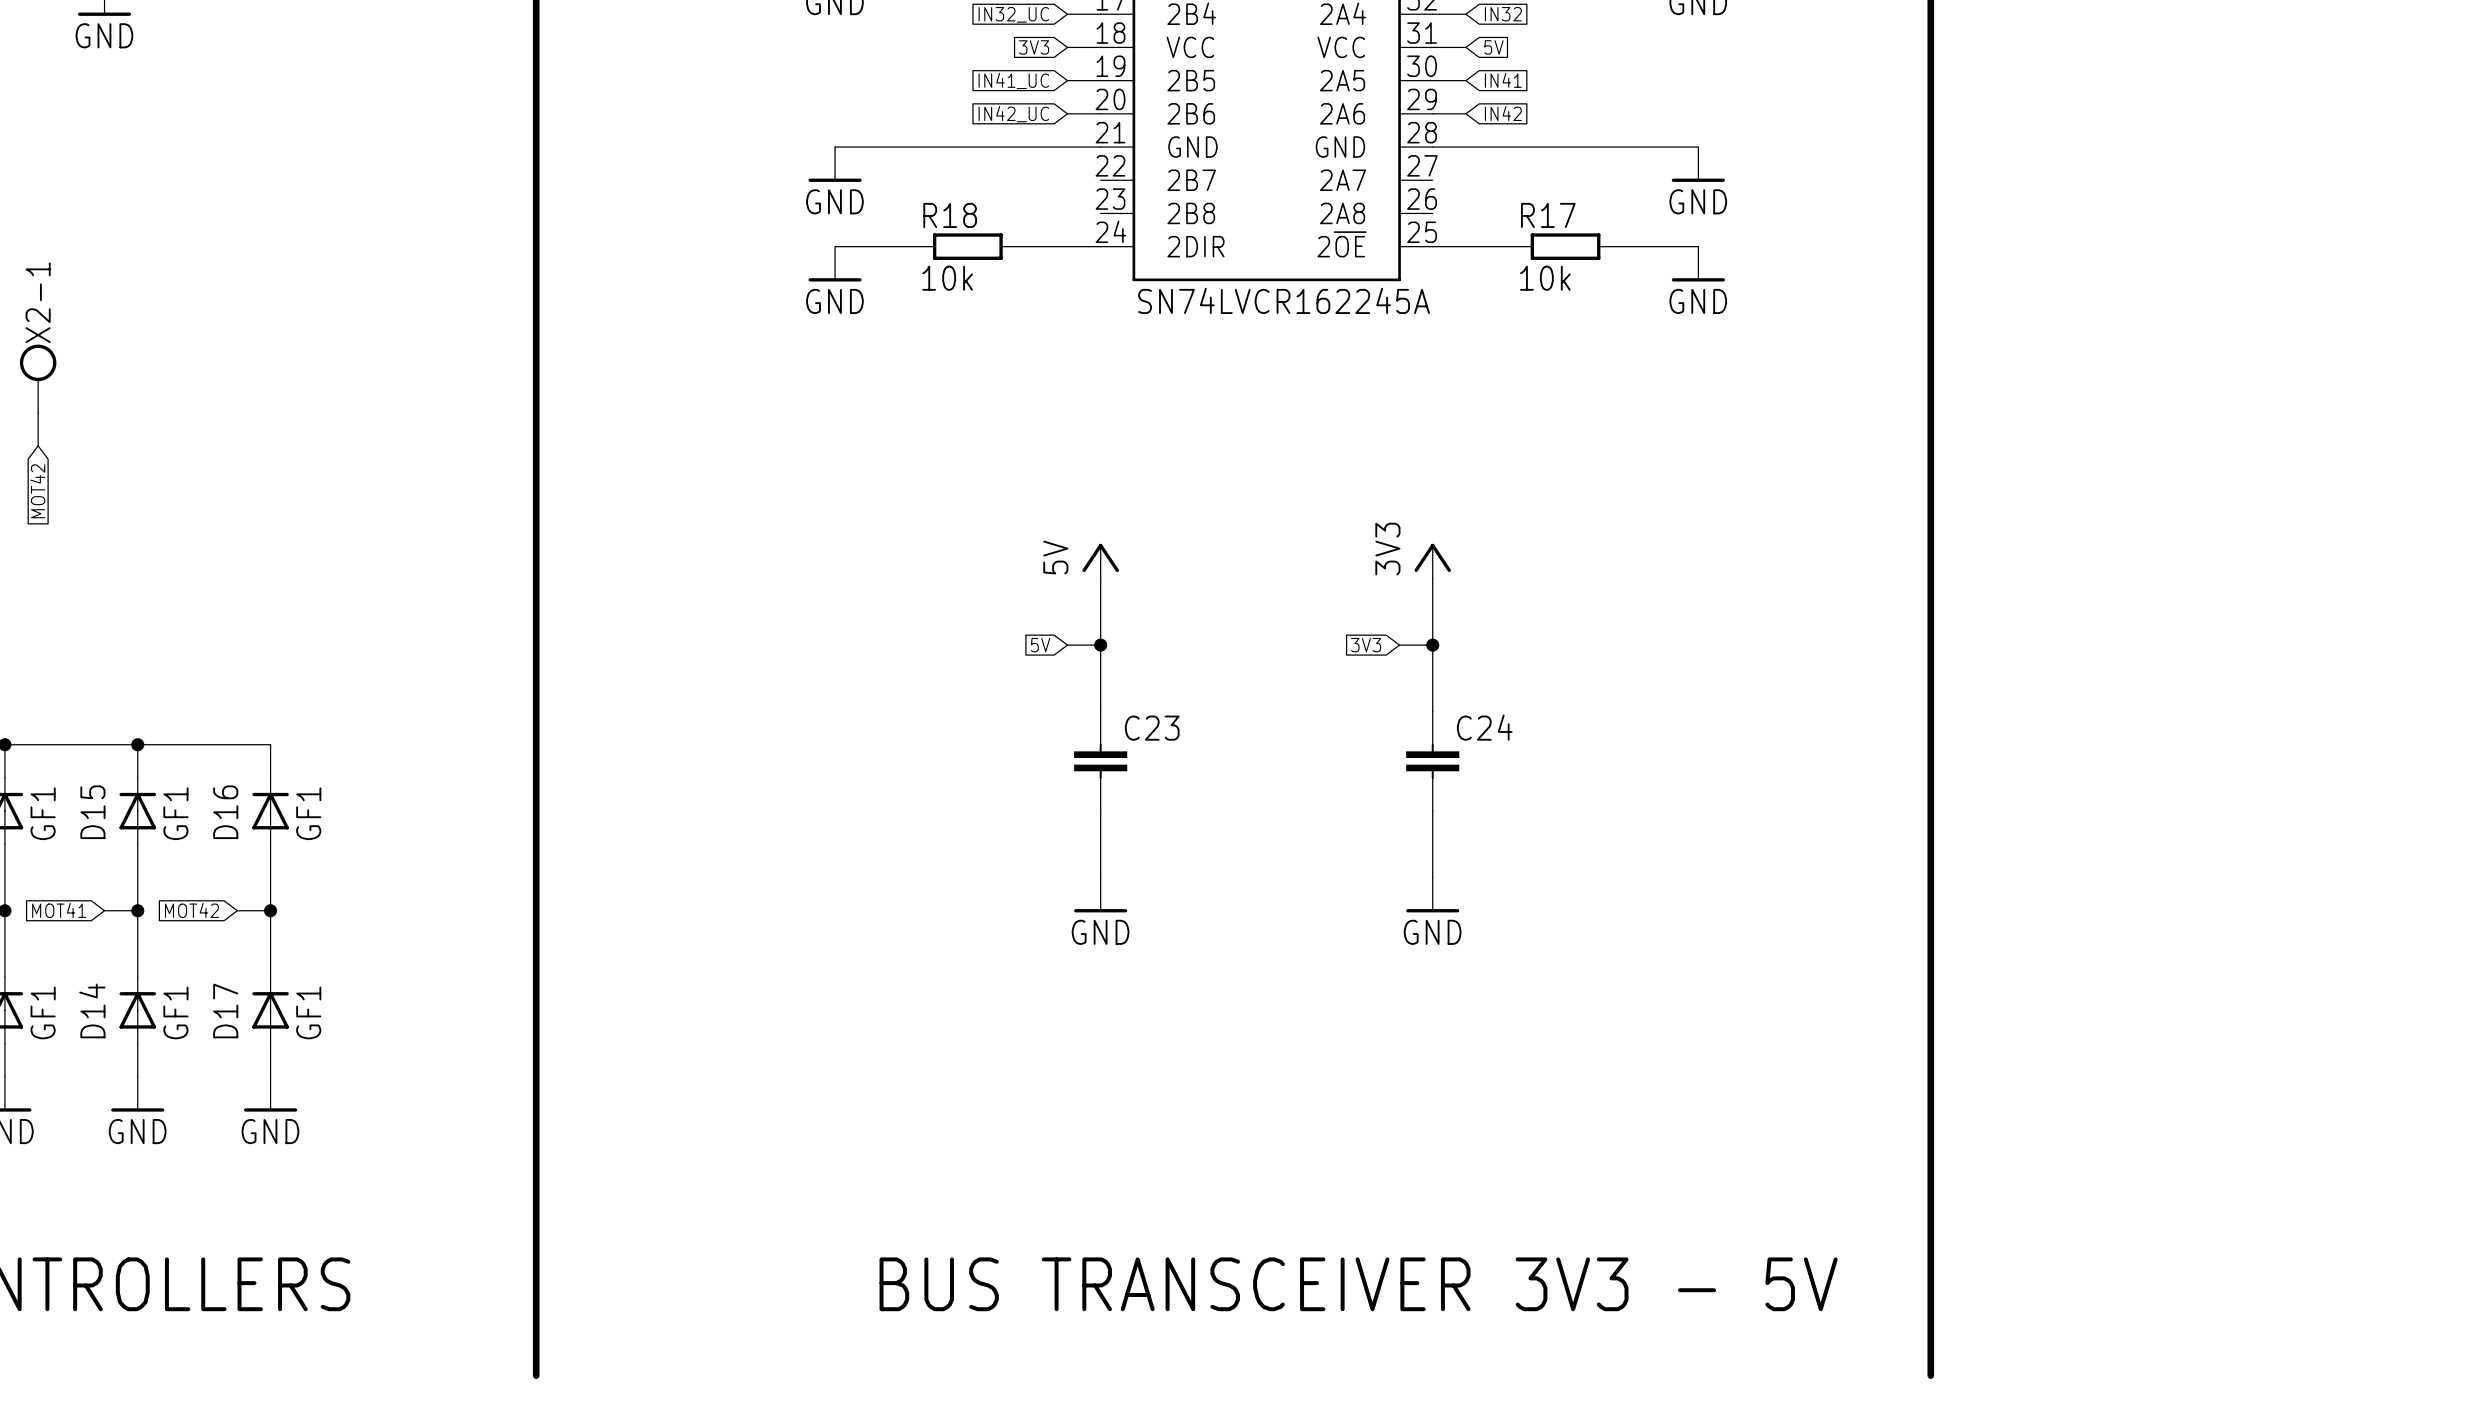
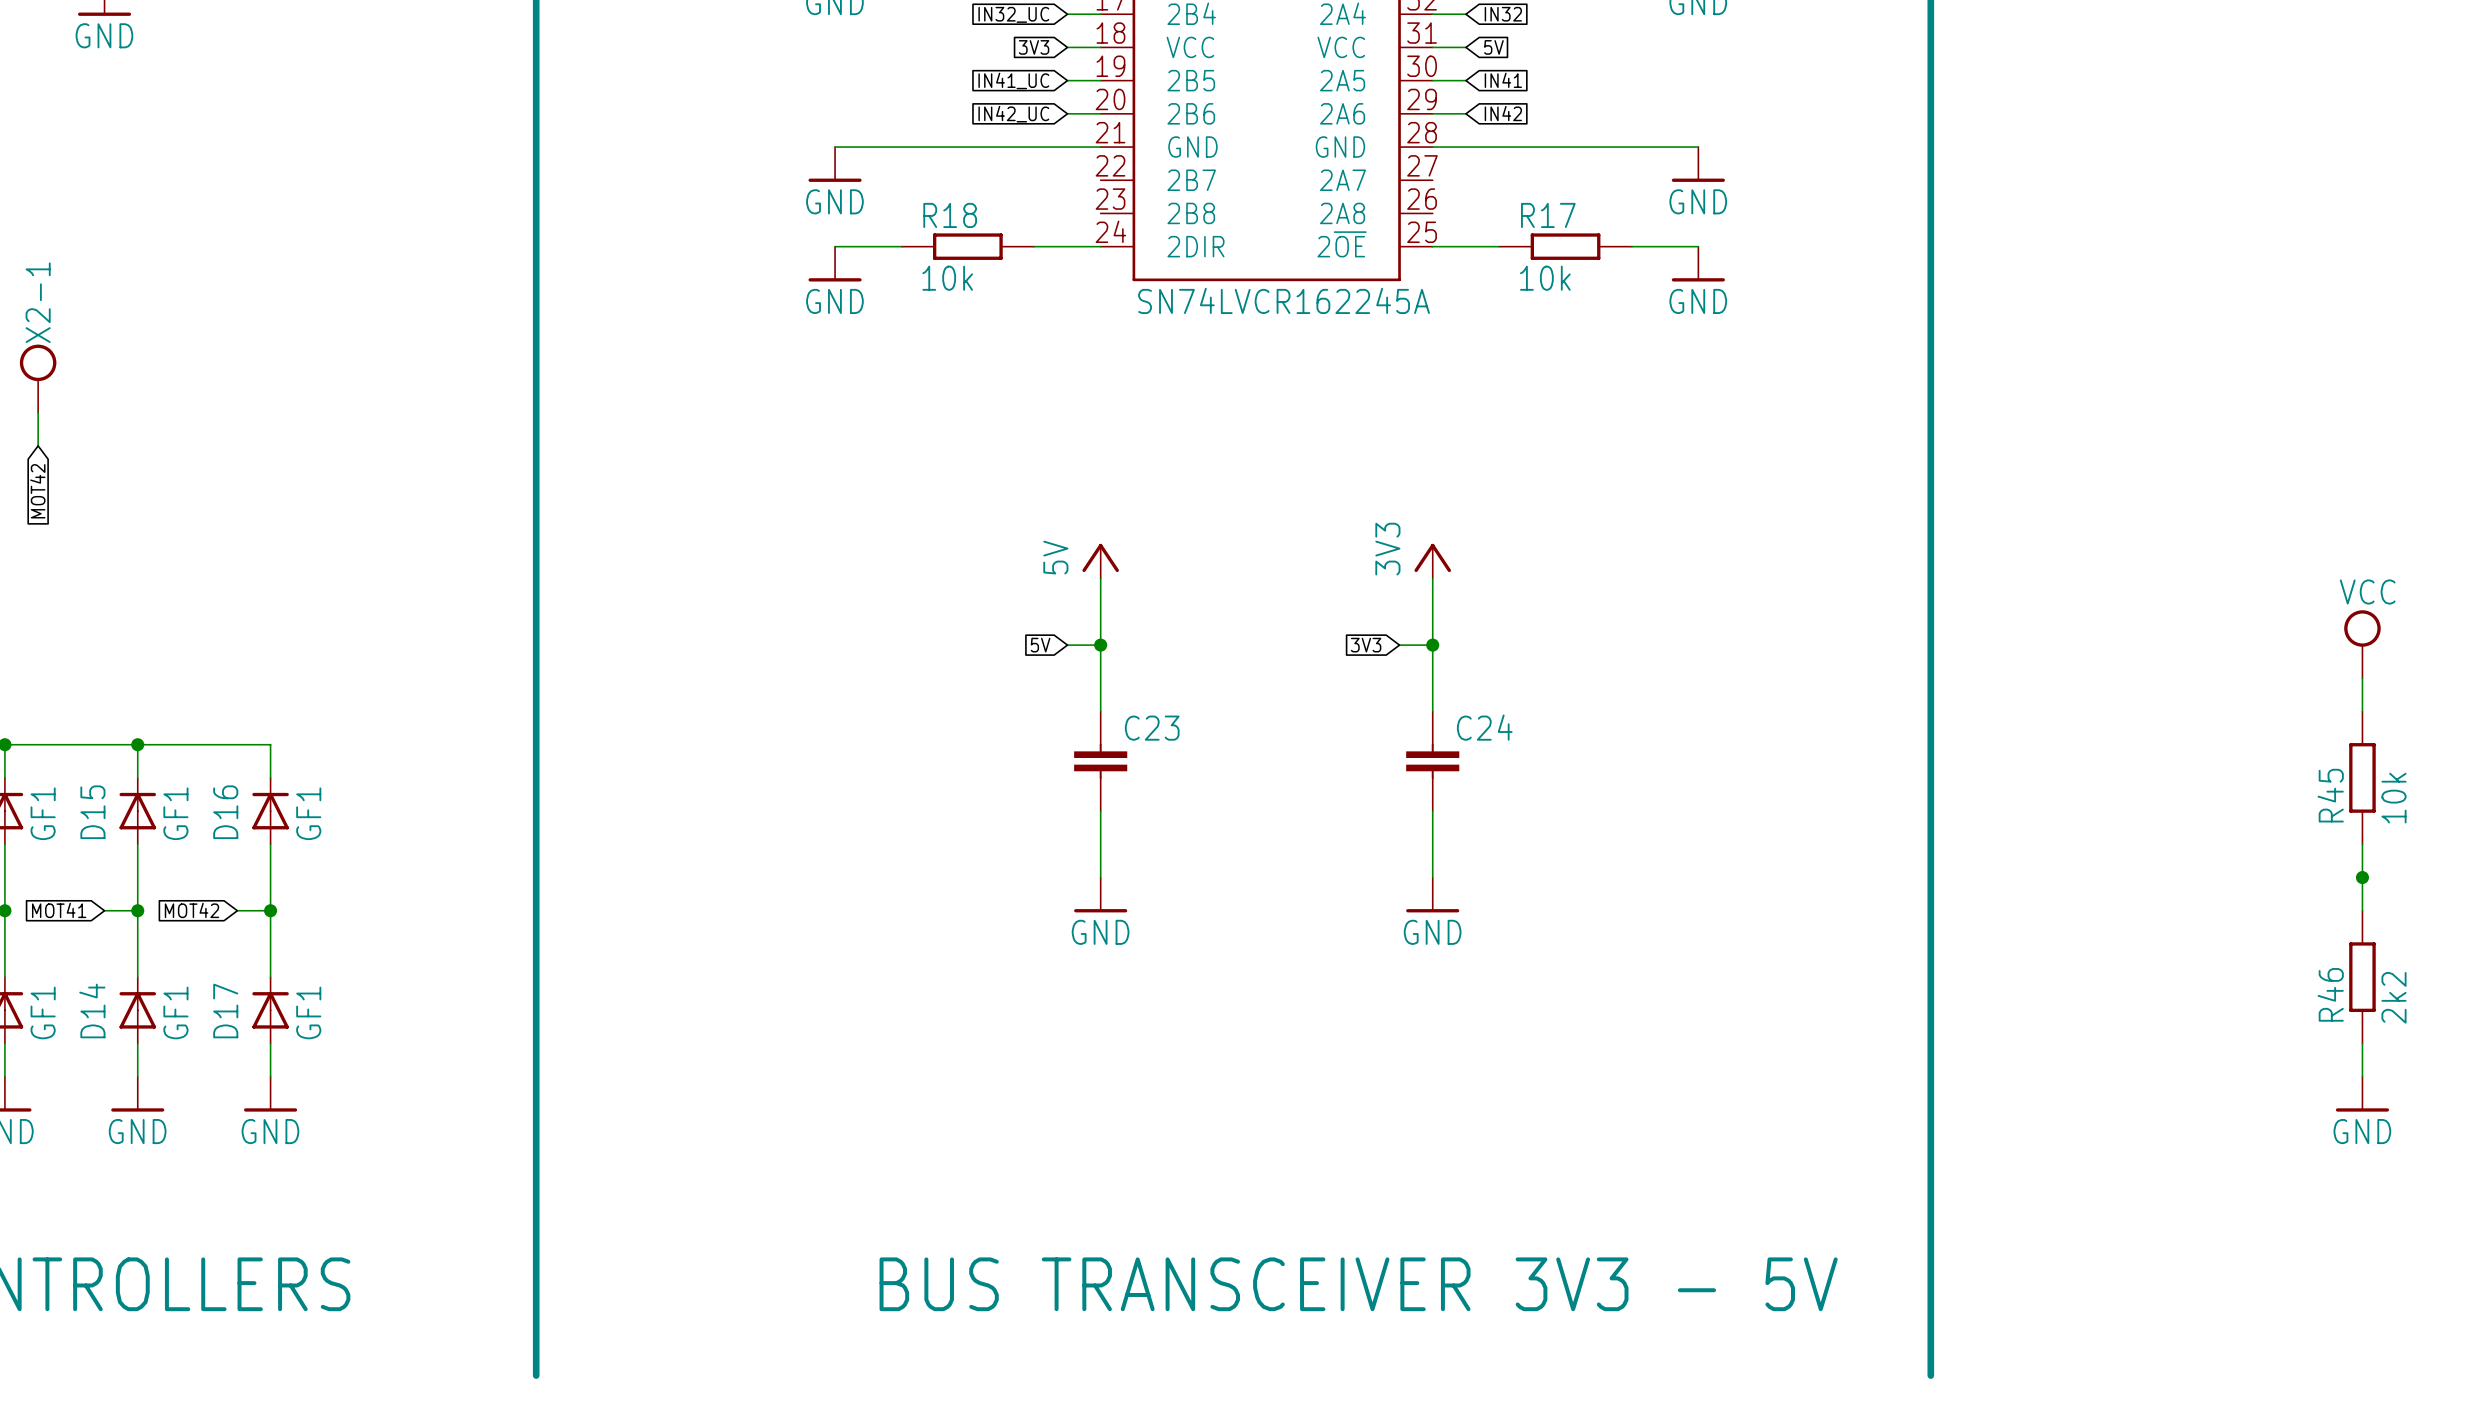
power symbol: none -> VCC (2362, 644)
wire: none -> (2362, 678) (2362, 711)
R45: none -> 10k (2362, 777)
wire: none -> (2362, 844) (2362, 910)
junction: none -> (2362, 877)
R46: none -> 2k2 (2362, 977)
wire: none -> (2362, 1043) (2362, 1076)
power symbol: none -> GND (2362, 1094)

